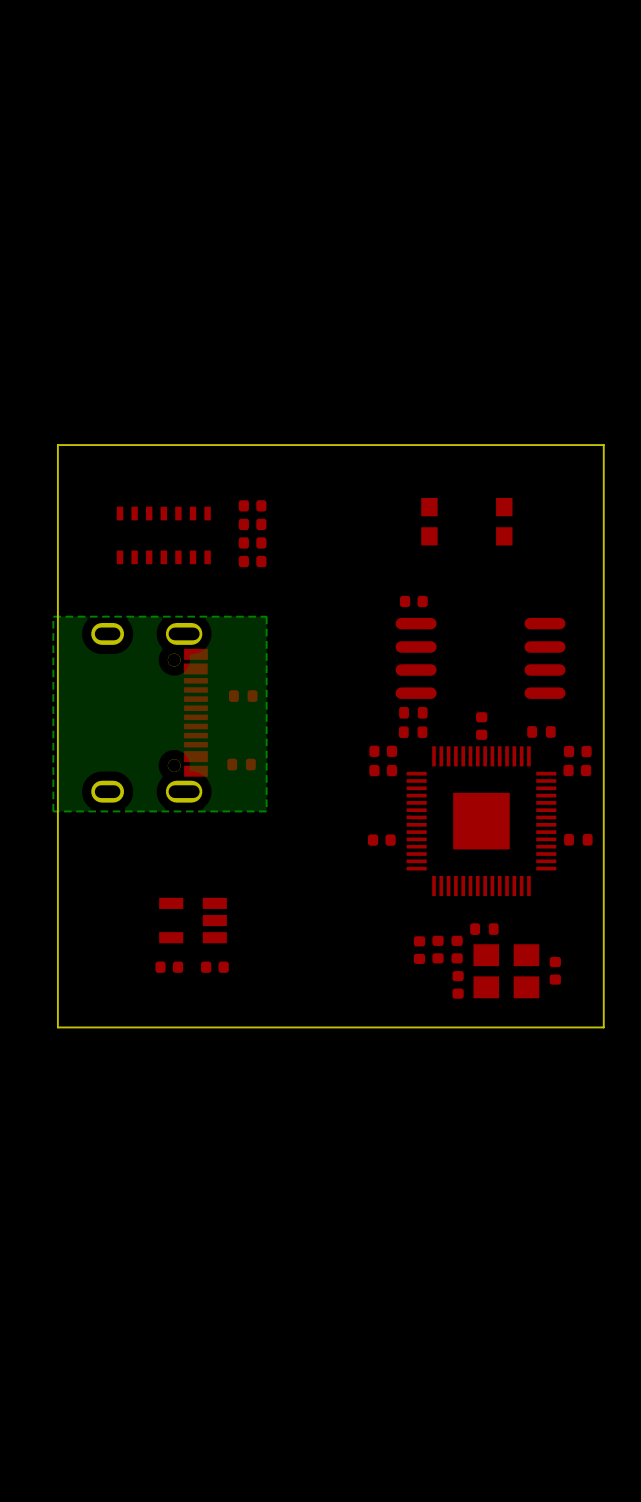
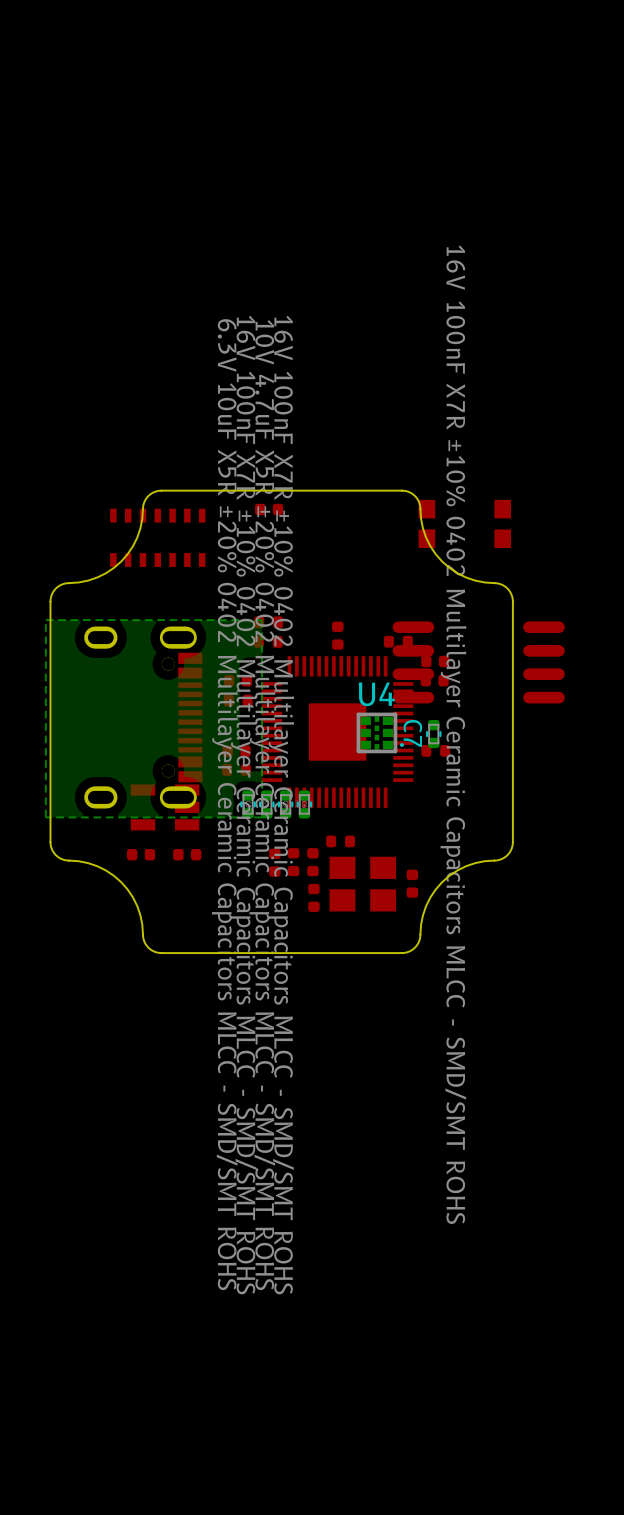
part side: top (252, 505) -> bottom (248, 804)
part: none -> (269, 509)
part side: top (252, 524) -> bottom (266, 804)
part side: top (252, 542) -> bottom (285, 804)
part side: top (252, 561) -> bottom (304, 804)
board edge: (57, 598) (57, 445) (603, 445) (603, 1027) (57, 1027) (57, 835) -> (50, 601) (53, 591) (59, 585) (97, 577) (121, 561) (137, 537) (145, 499) (153, 492) (161, 490) (408, 491) (418, 501) (426, 537) (442, 561) (466, 577) (504, 585) (511, 593) (512, 601) (511, 848) (502, 858) (466, 866) (442, 882) (426, 906) (419, 940) (409, 951) (401, 953) (155, 952) (144, 942) (137, 906) (121, 882) (97, 866) (59, 857) (52, 850) (50, 842)
part: (413, 601) -> none
part: none -> (268, 622)
part: none -> (337, 635)
part: none -> (398, 641)
part: none -> (268, 641)
part: none -> (435, 661)
part: none -> (238, 680)
part: none -> (434, 680)
part: (413, 712) -> none
part: (481, 726) -> none
U4: none -> (380, 732)
C7: none -> 16V 100nF X7R ±10% 0402 Multilayer Ceramic Capacitors MLCC - SMD/SMT ROHS (433, 734)
part: (541, 731) -> none
part: (413, 732) -> none
part: none -> (435, 750)
part: none -> (236, 751)
part: (383, 751) -> none
part: (577, 751) -> none
part: (383, 770) -> none
part: (577, 770) -> none
part position: (481, 821) -> (337, 732)
part: none -> (340, 841)
part: (578, 839) -> none
part: (381, 840) -> none
part: none -> (141, 854)
part: none -> (187, 854)
part: none -> (293, 862)
part: none -> (312, 862)
part: none -> (274, 862)
part: none -> (412, 883)
part: none -> (313, 897)
part position: (193, 920) -> (165, 807)
part: (484, 929) -> none
part: (438, 949) -> none
part: (457, 949) -> none
part: (419, 950) -> none
part: (169, 967) -> none
part: (214, 967) -> none
part: (555, 970) -> none
part position: (506, 971) -> (362, 884)
part: (458, 984) -> none

